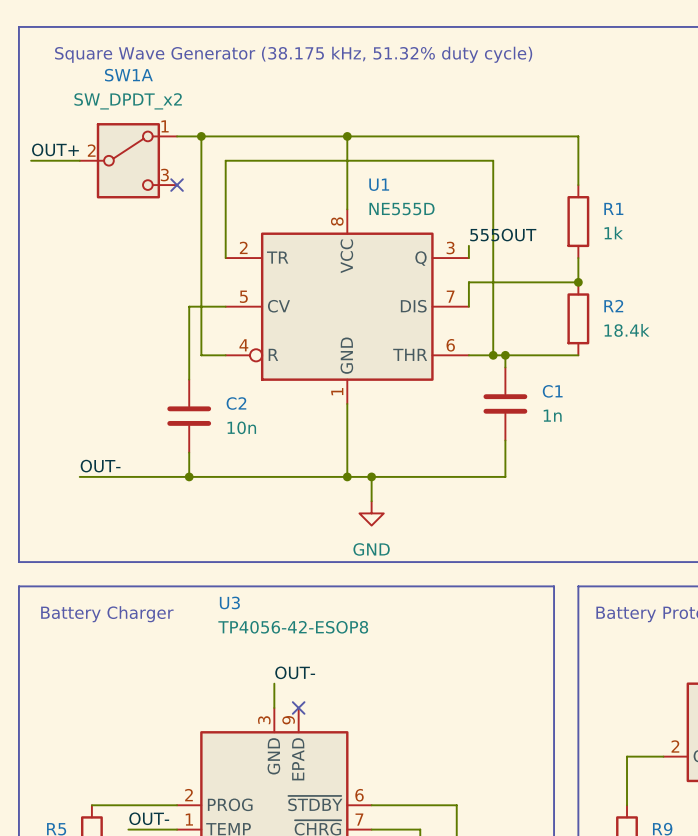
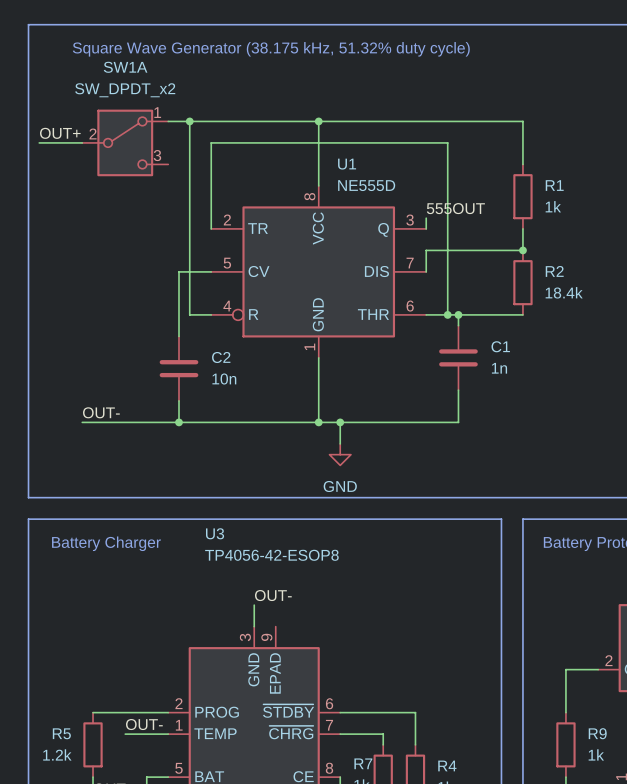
no-connect mark: (177, 185) -> none
no-connect mark: (298, 707) -> none

